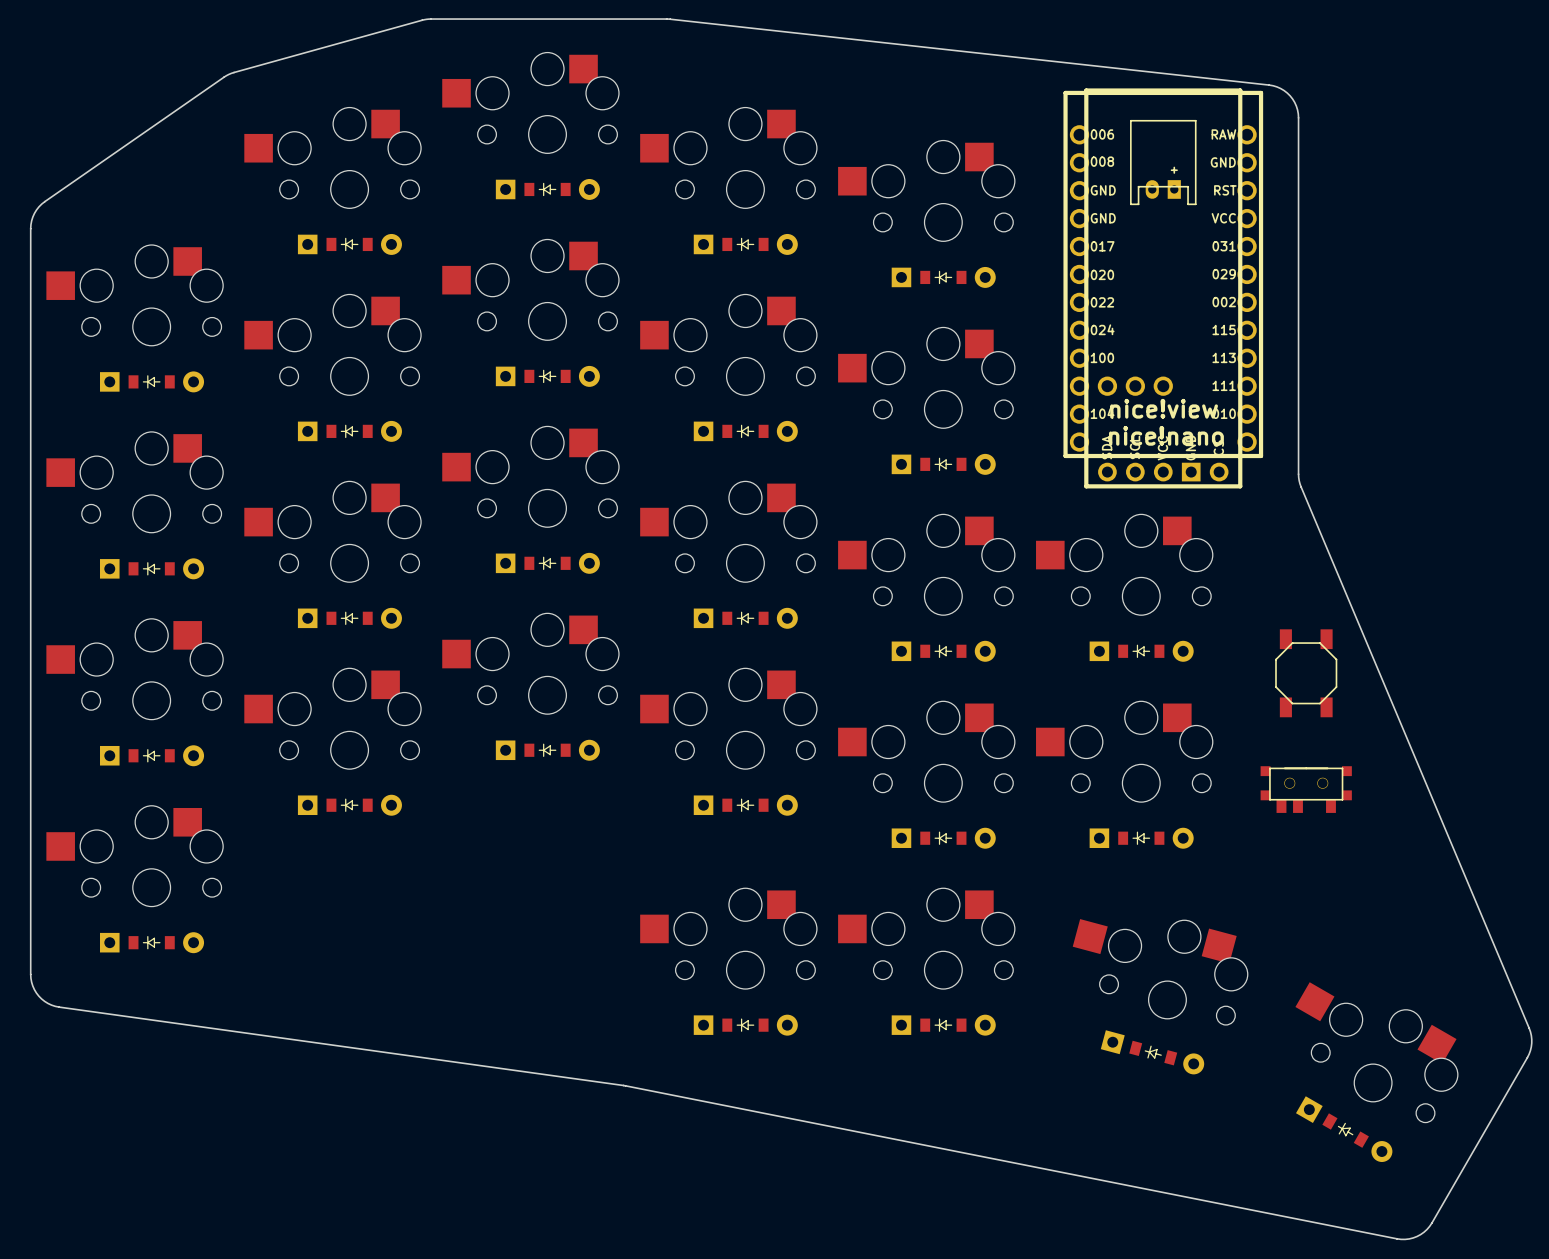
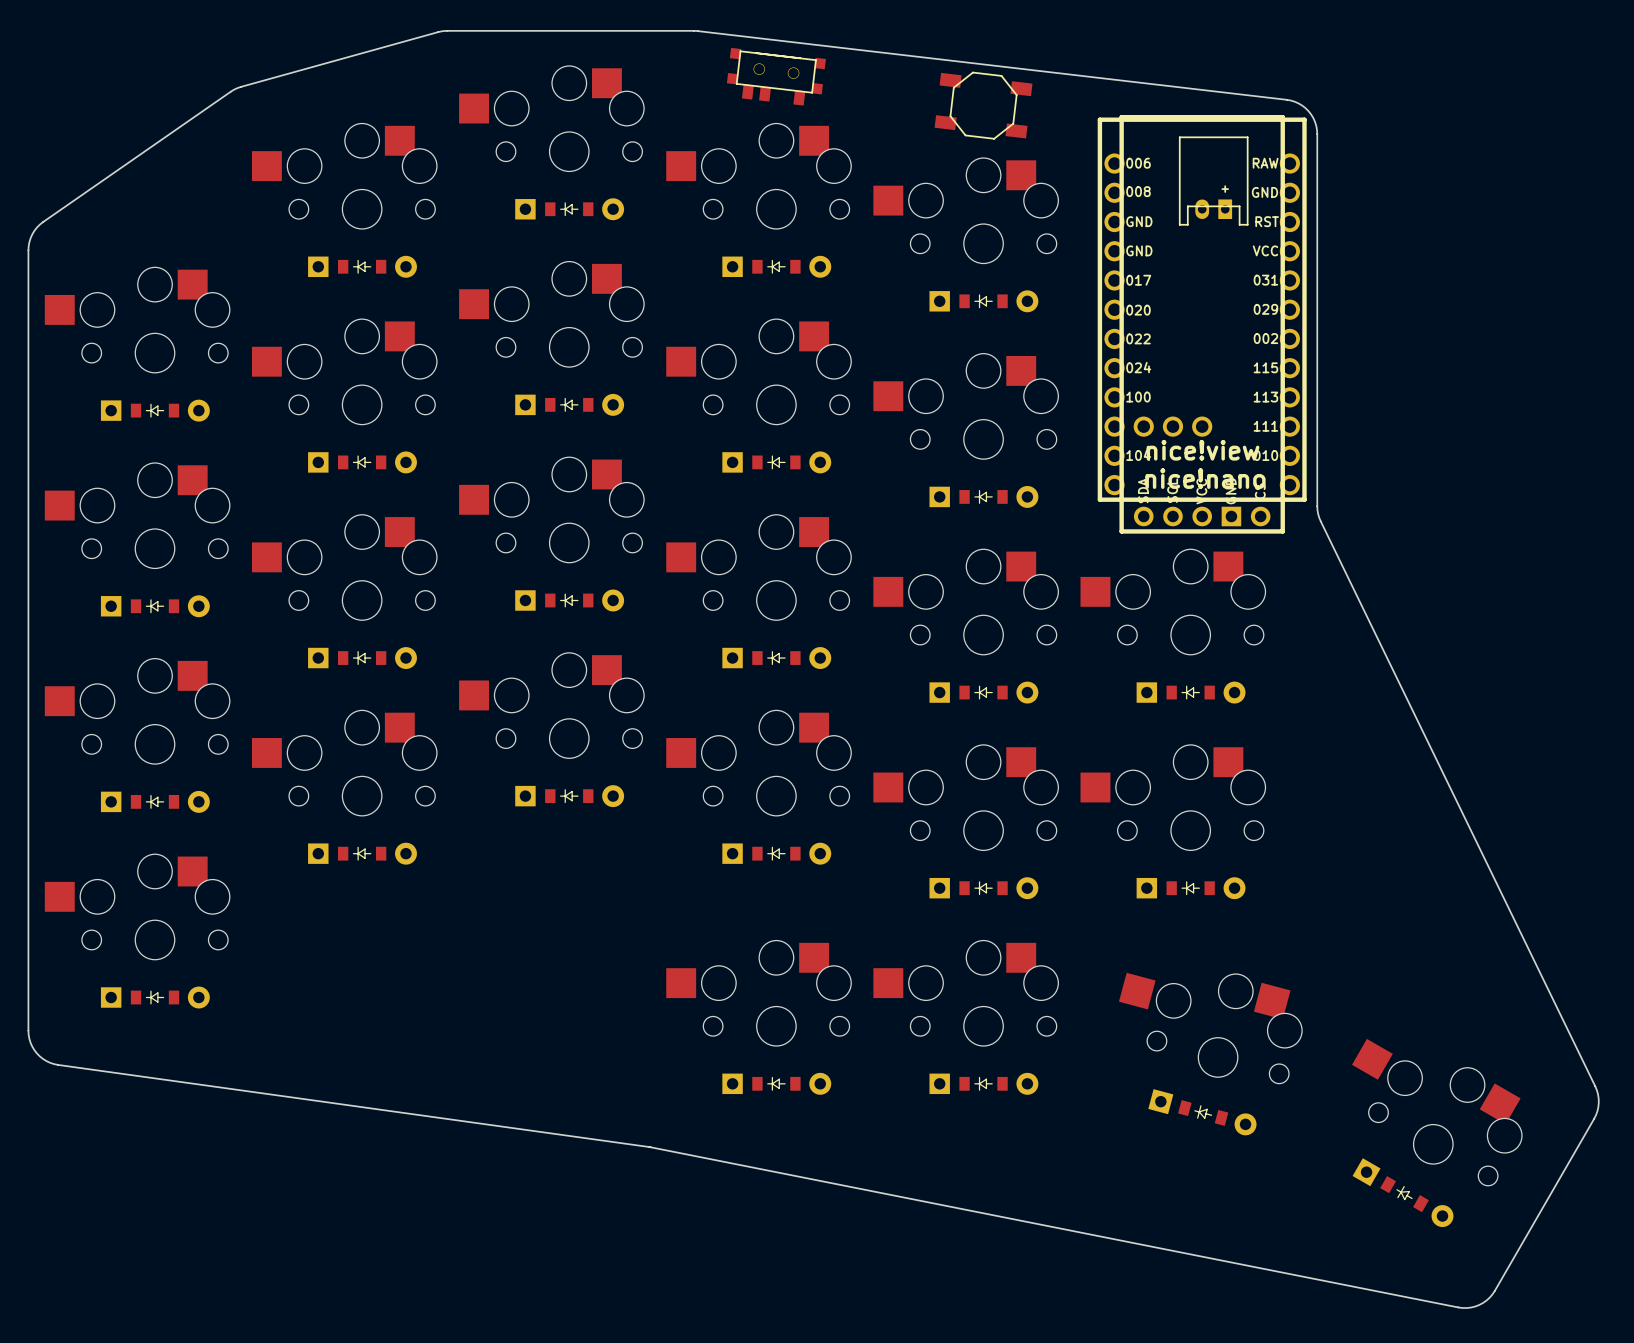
board edge: (666, 19) (1269, 85) (1280, 88) (1290, 95) (1296, 106) (1298, 117) (1299, 480) (1529, 1028) (1531, 1043) (1526, 1058) -> (693, 30) (1286, 99) (1298, 103) (1308, 111) (1315, 121) (1317, 134) (1318, 513) (1595, 1086) (1598, 1102) (1594, 1118)
part: none -> (776, 76)
part: none -> (983, 105)
part position: (1163, 274) -> (1202, 309)
part position: (1163, 288) -> (1202, 324)
part: (1306, 673) -> none
part: (1306, 789) -> none

